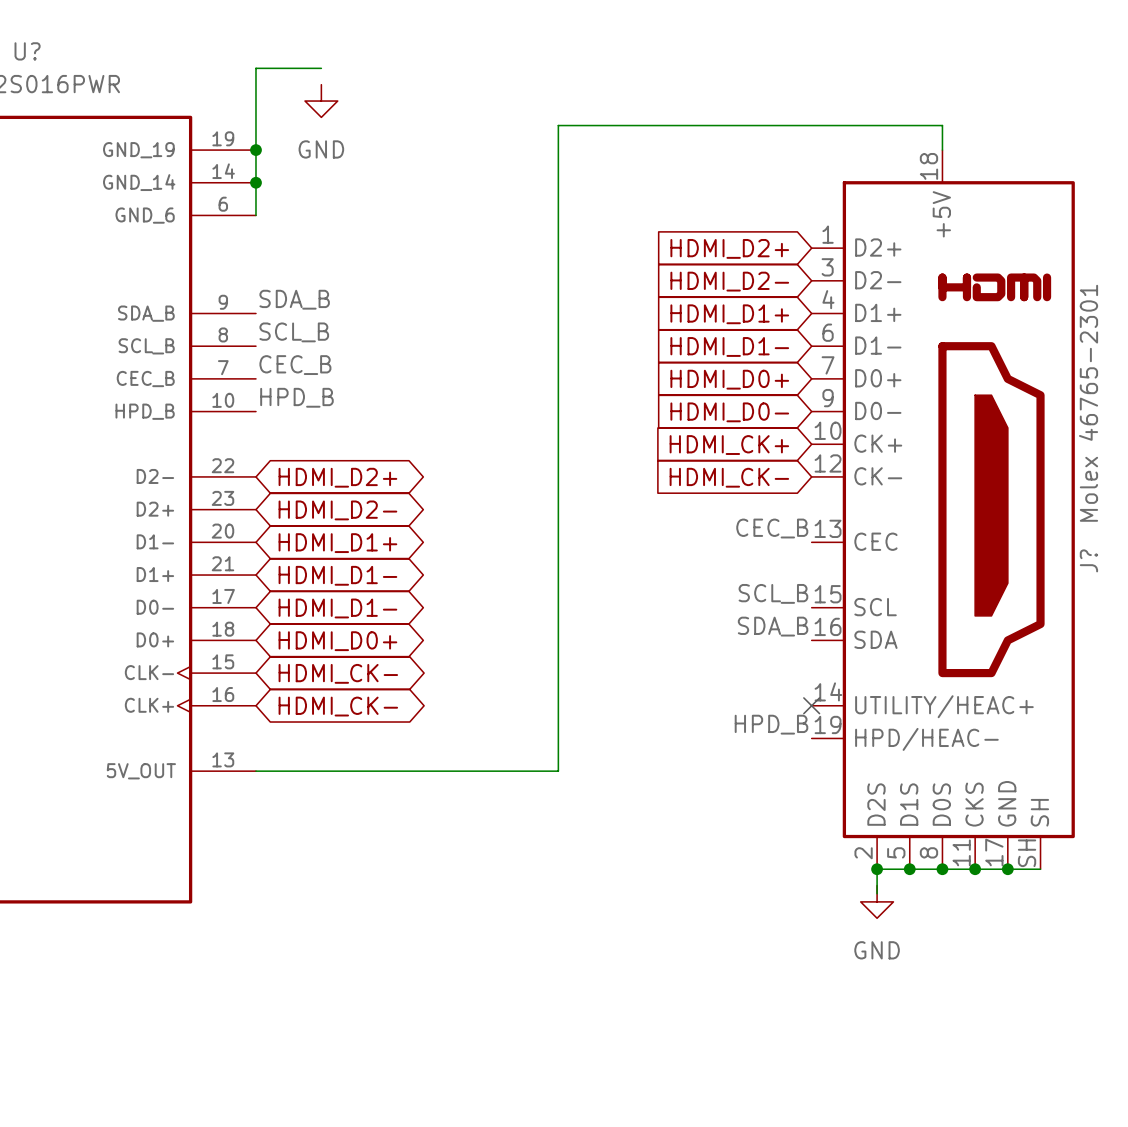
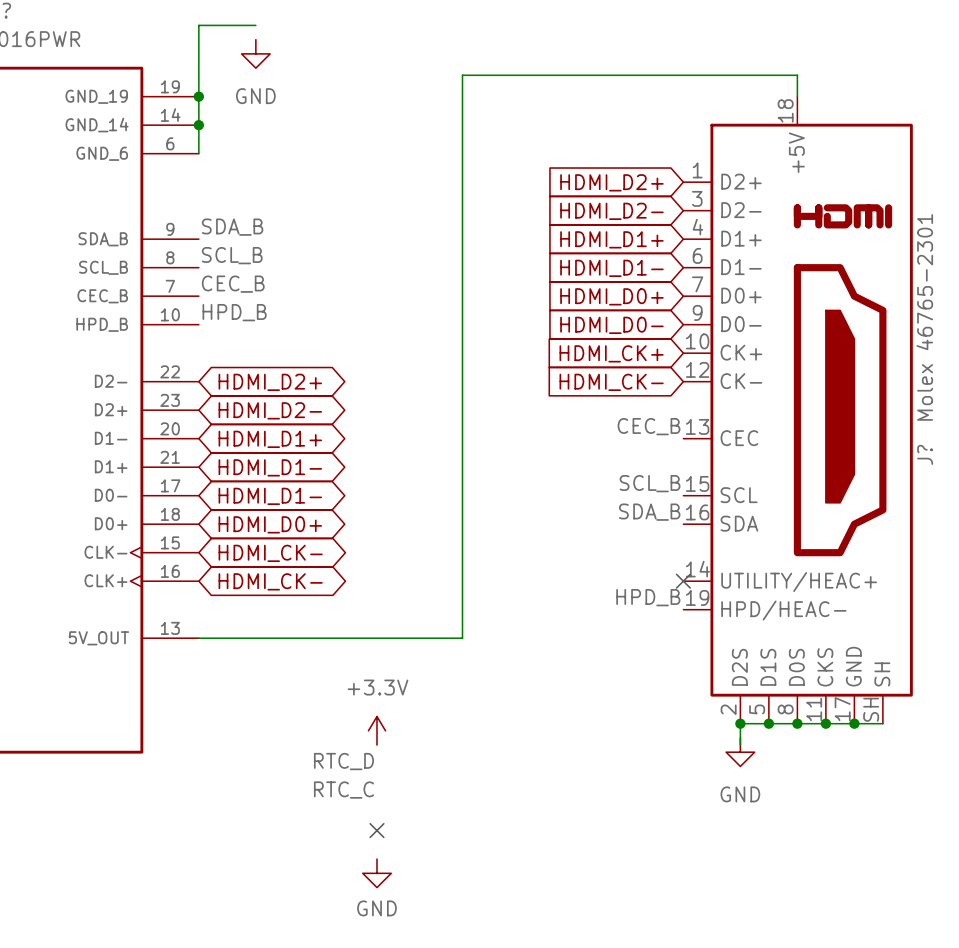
power symbol: none -> +3.3V (376, 730)
label: none -> RTC_D (343, 761)
label: none -> RTC_C (343, 790)
no-connect mark: none -> (376, 830)
power symbol: none -> GND (376, 873)

